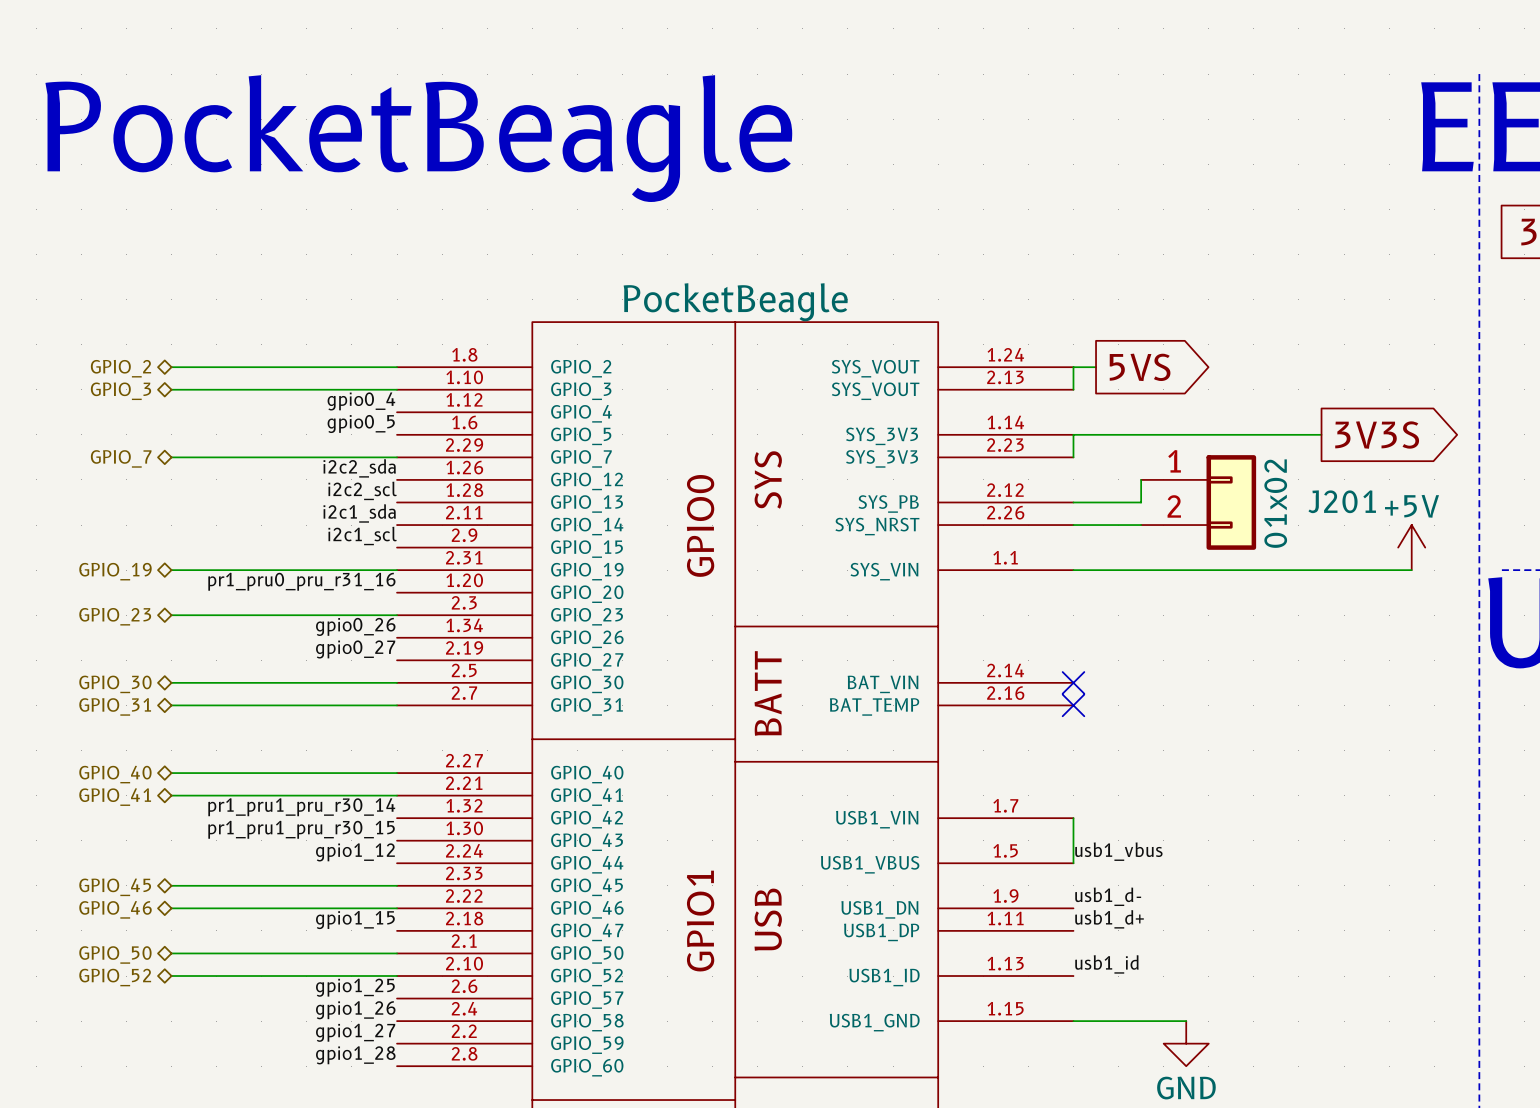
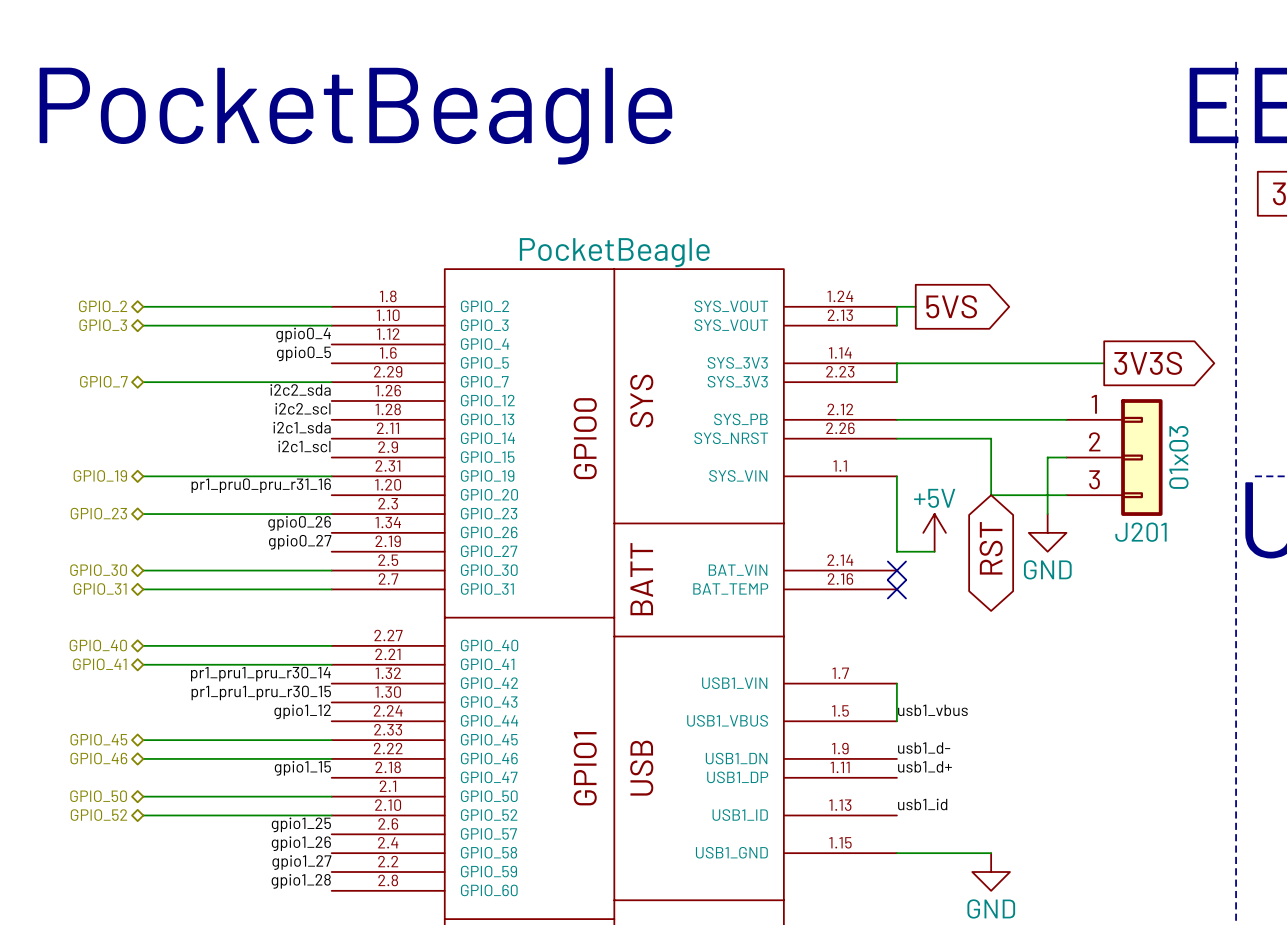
J201 symbol: [1141, 455, 1257, 550] -> [1066, 399, 1163, 516]
wire: (1141, 479) (1141, 502) -> (1066, 419) (953, 419)
J201 name position: J201 (1342, 501) -> J201 (1140, 532)
J201 value: 01x02 (1275, 503) -> 01x03 (1178, 457)
wire: none -> (953, 438) (991, 438) (991, 495) (1066, 495)
wire: none -> (1066, 457) (1047, 457) (1047, 514)
power symbol position: +5V (1411, 547) -> +5V (934, 532)
wire: (1073, 570) (1411, 570) -> (896, 476) (896, 551) (934, 551)
power symbol: none -> GND (1047, 532)
global label: none -> RST (991, 548)

